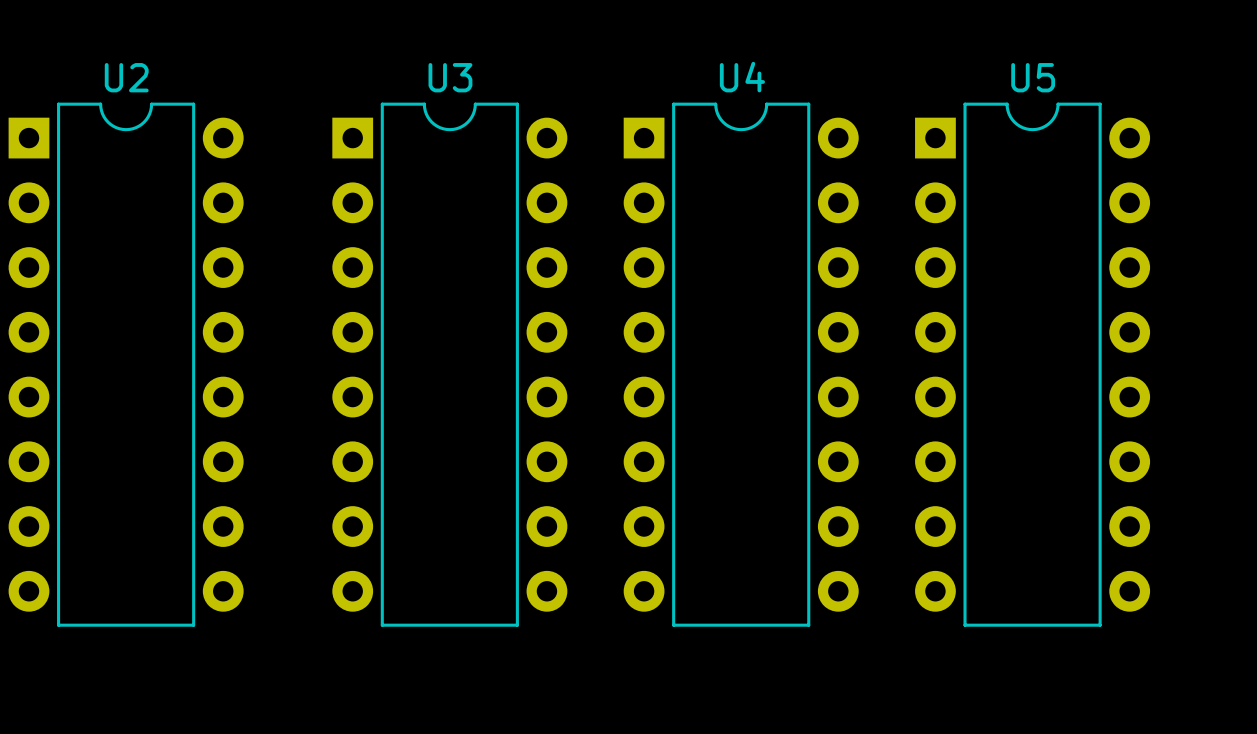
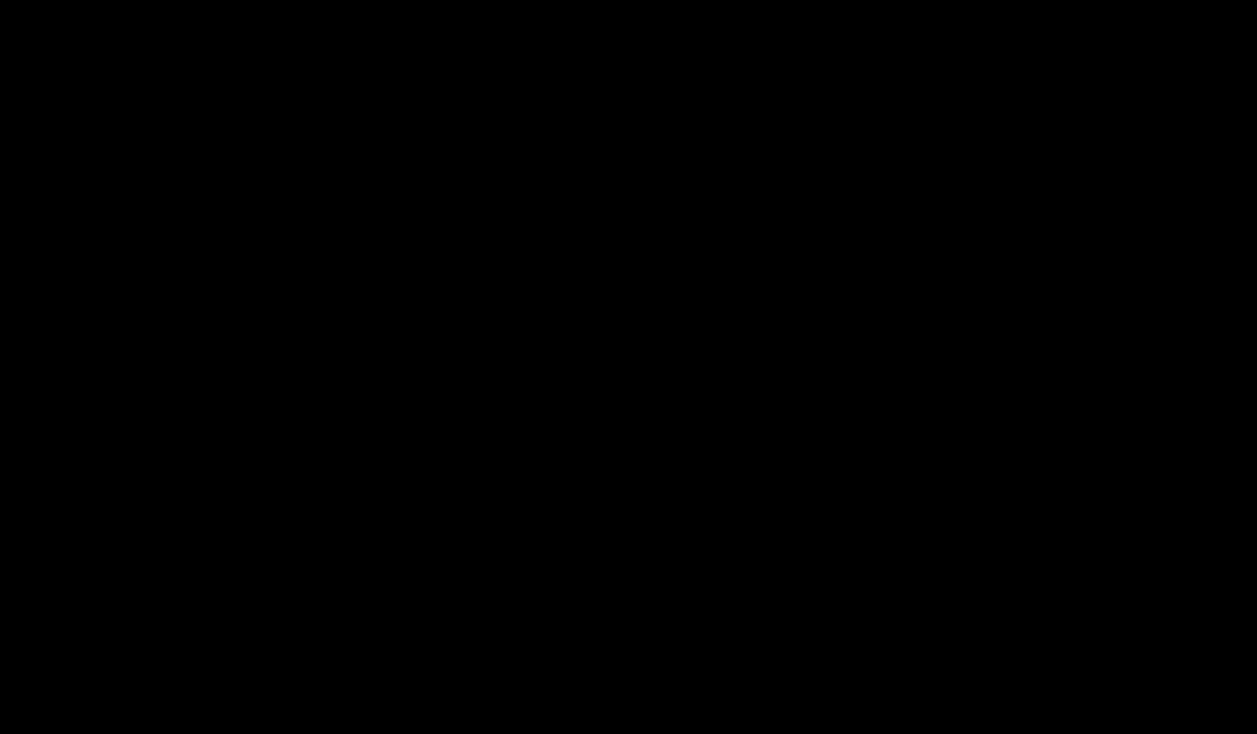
U2: (126, 364) -> none
U3: (449, 364) -> none
U4: (741, 364) -> none
U5: (1032, 364) -> none

